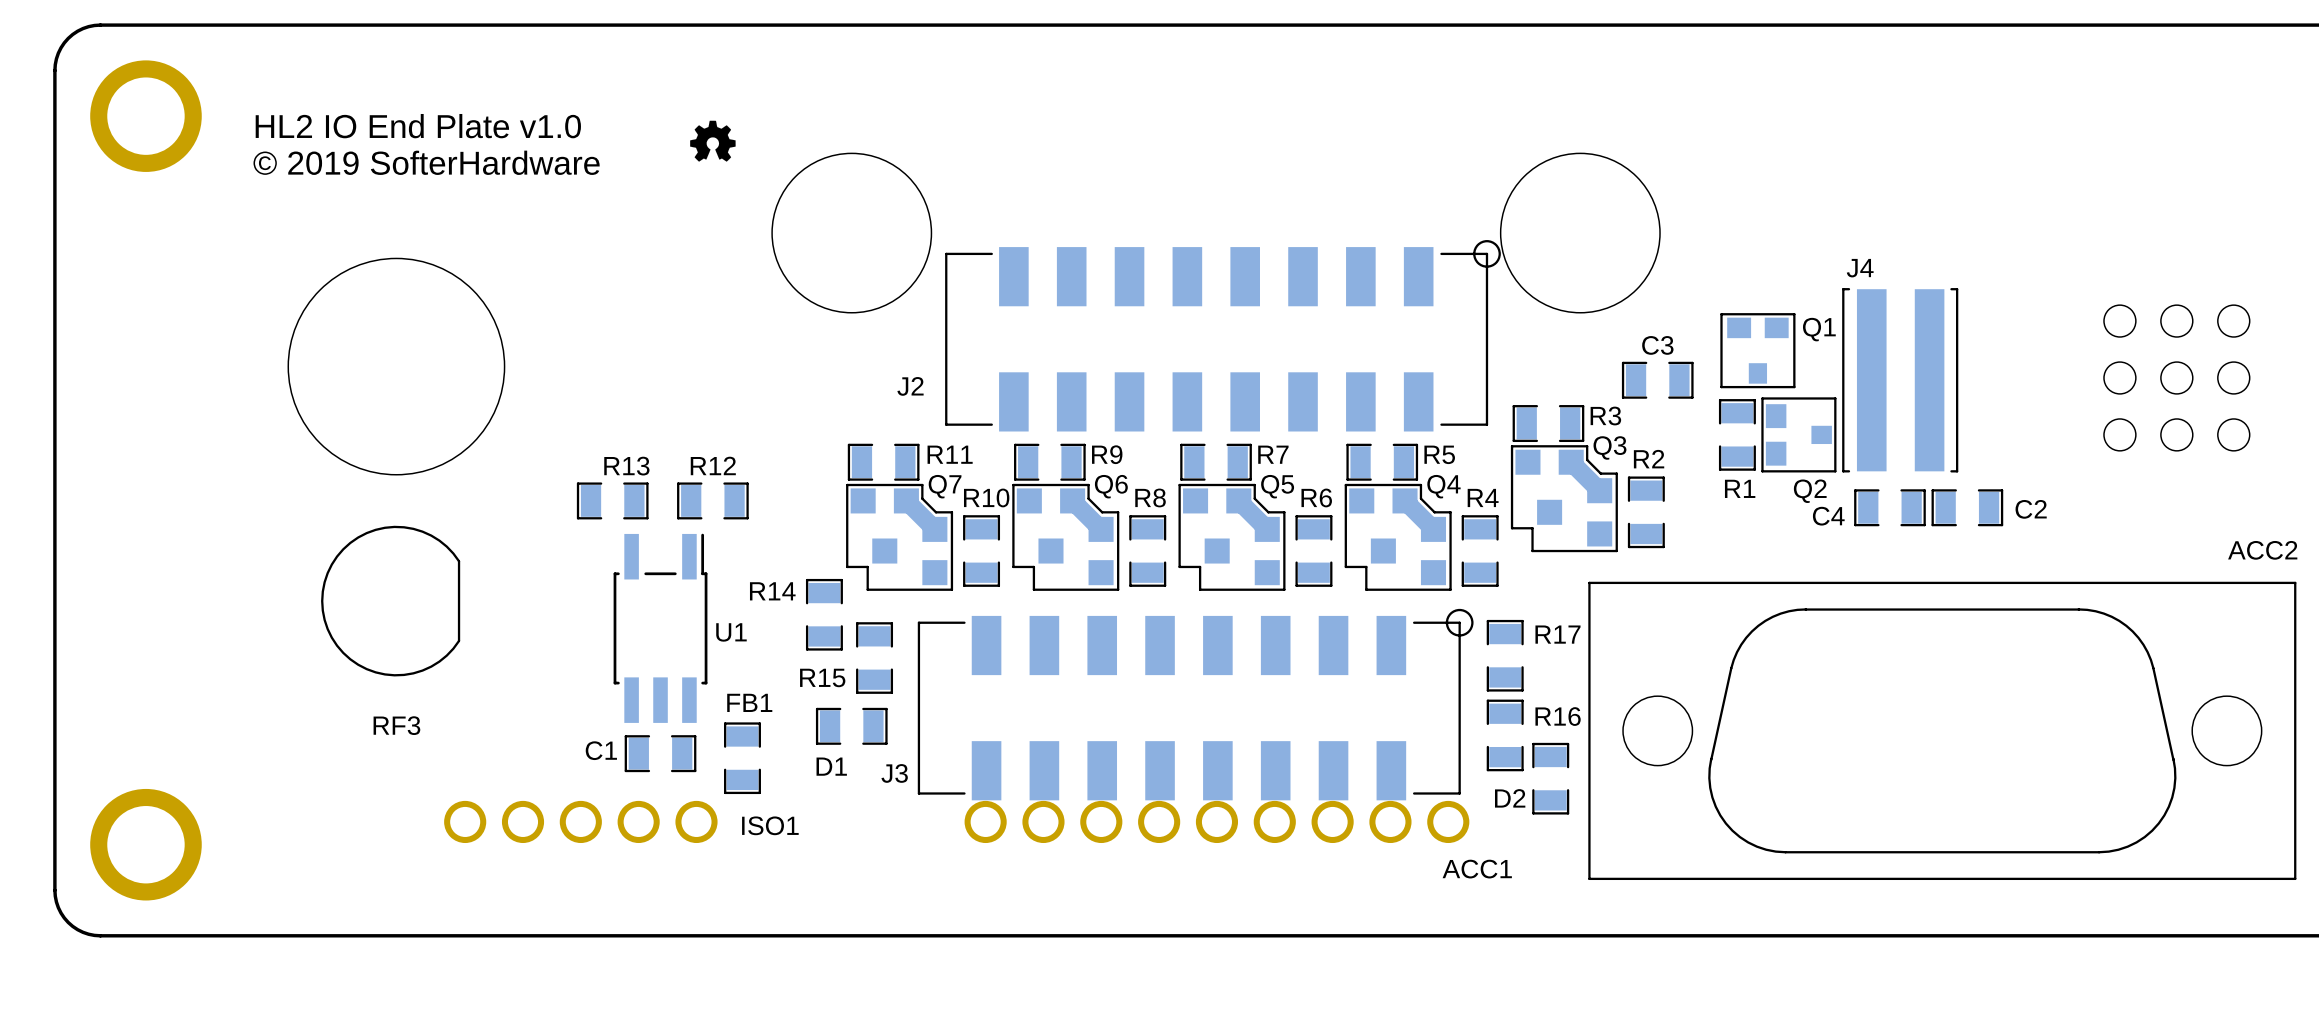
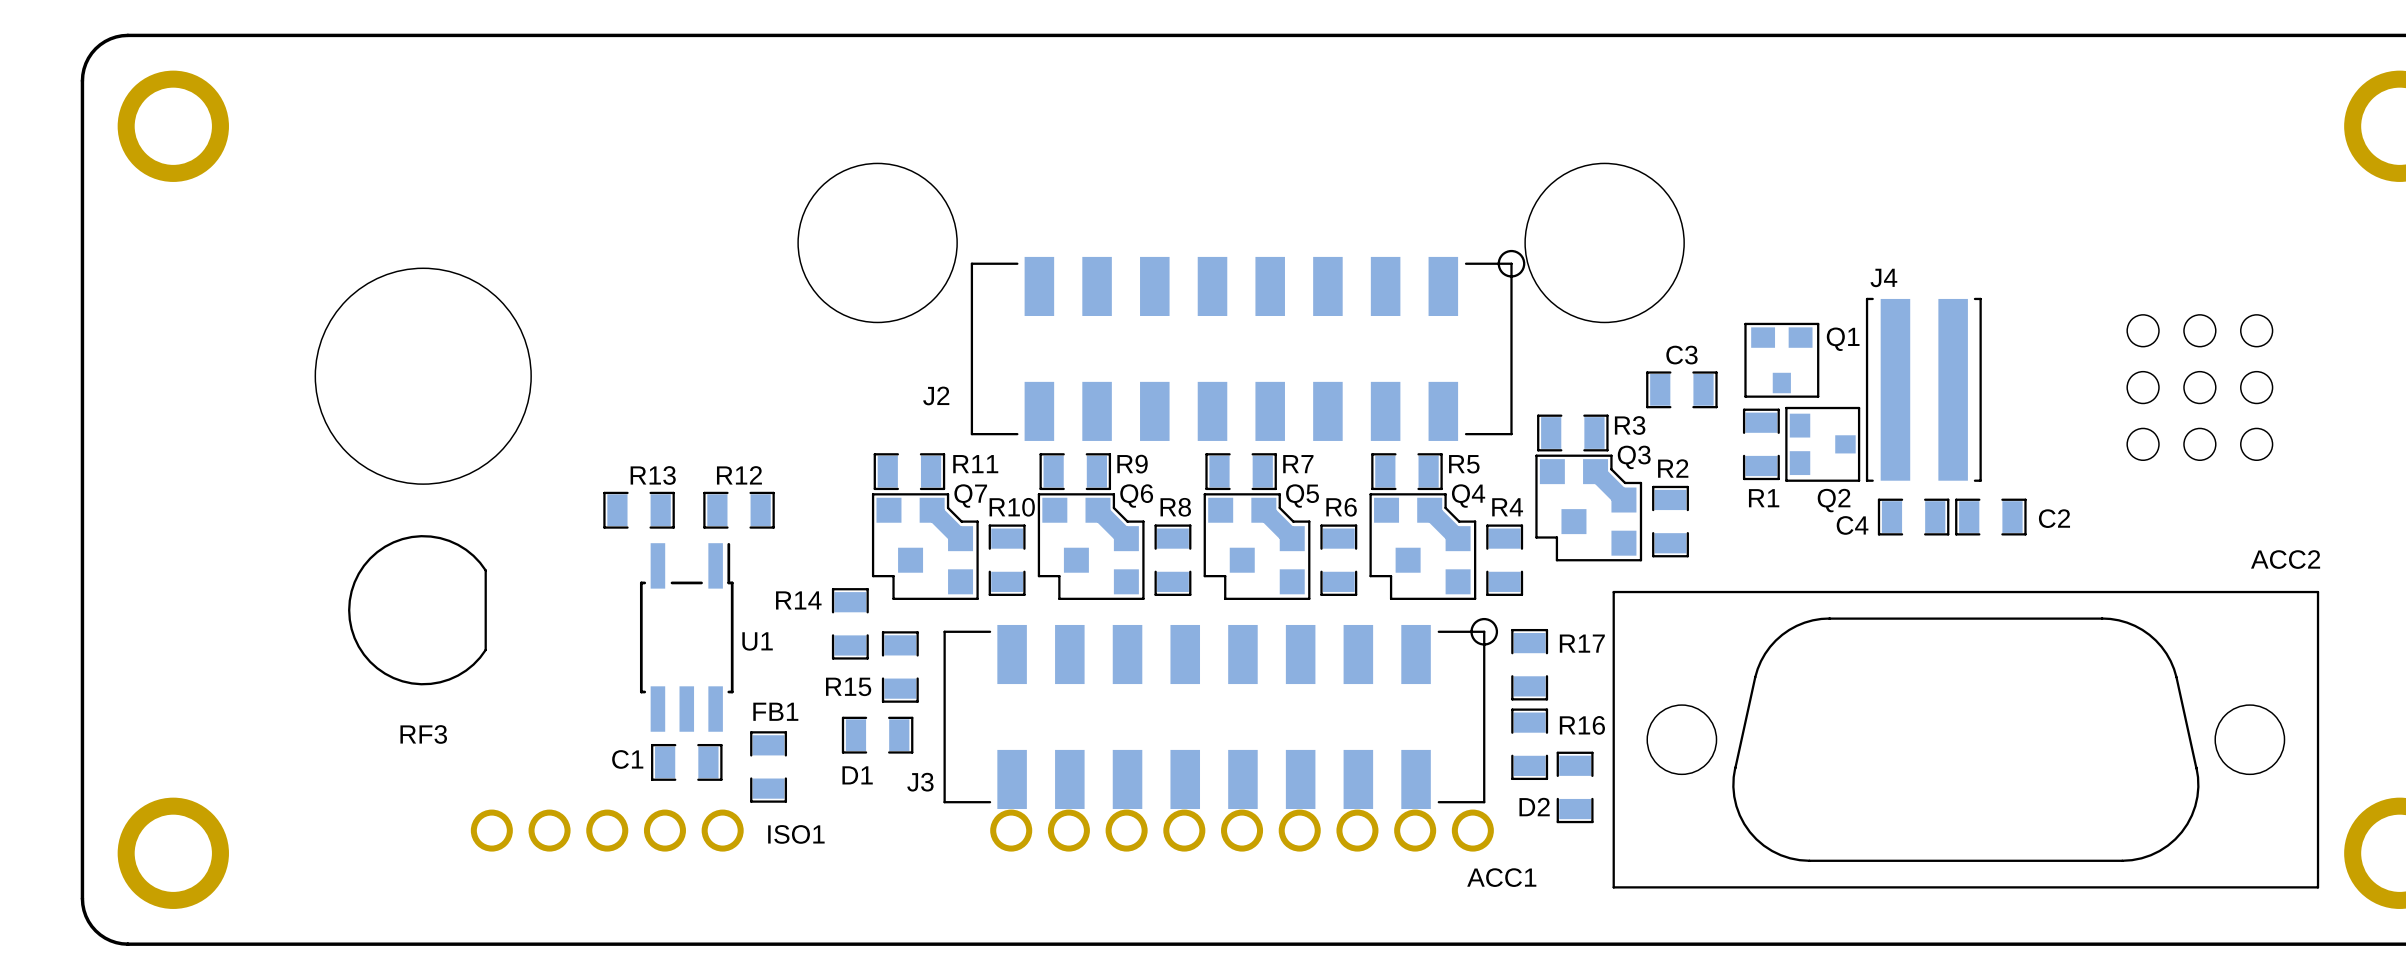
drawing: [690, 120, 736, 162] -> none
text: HL2 IO End Plate v1.0 (418, 126) -> none
text: © 2019 SofterHardware (426, 162) -> none

